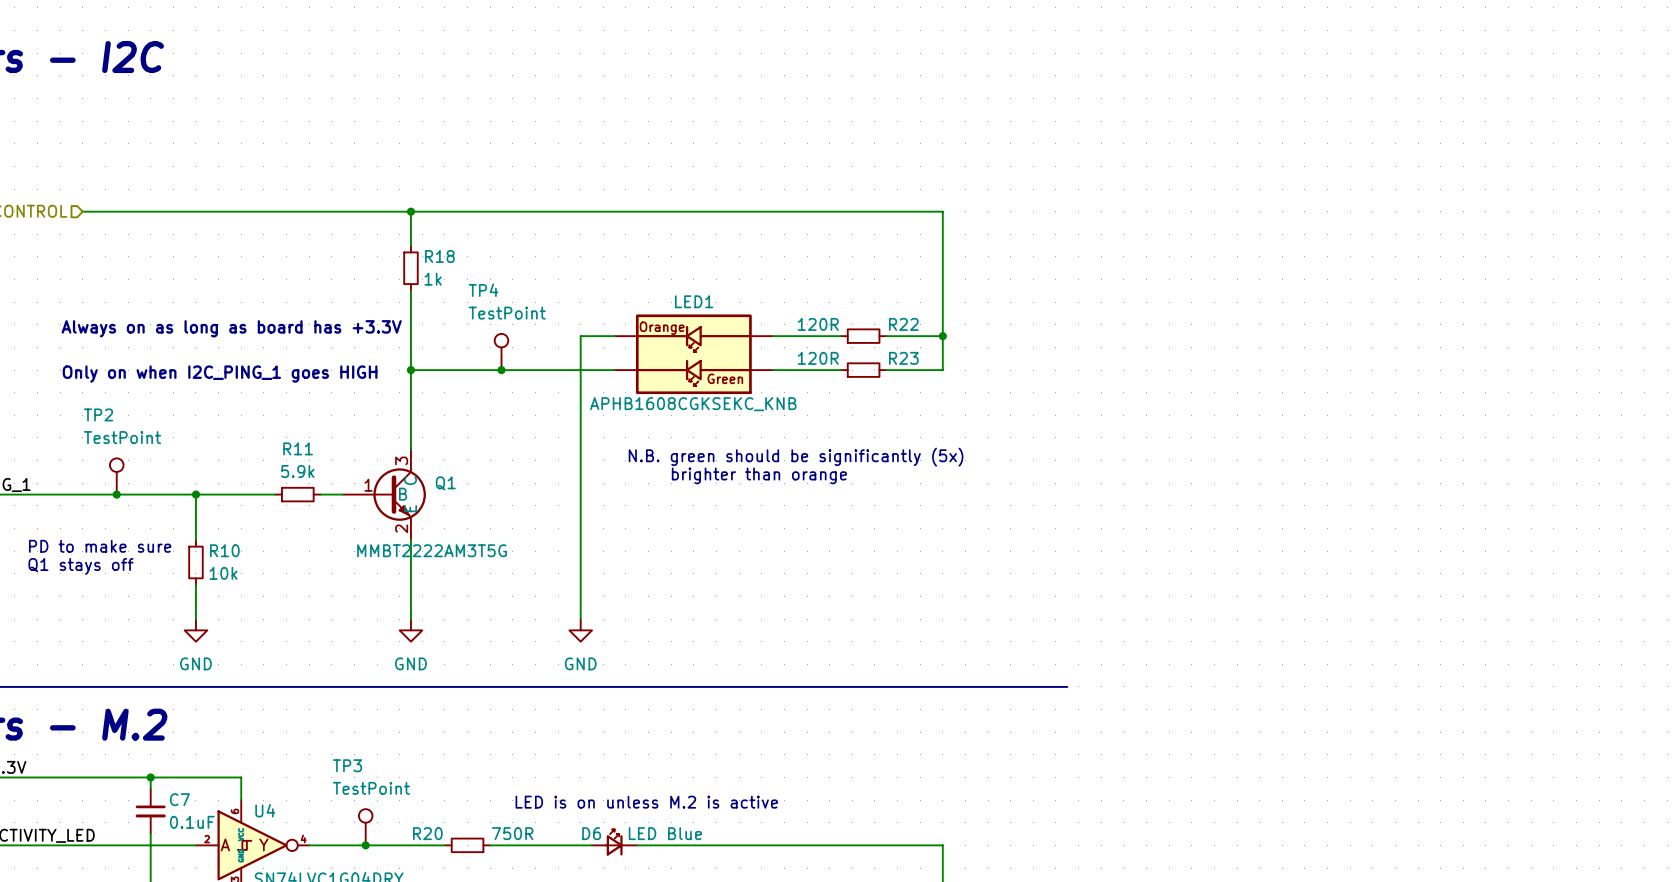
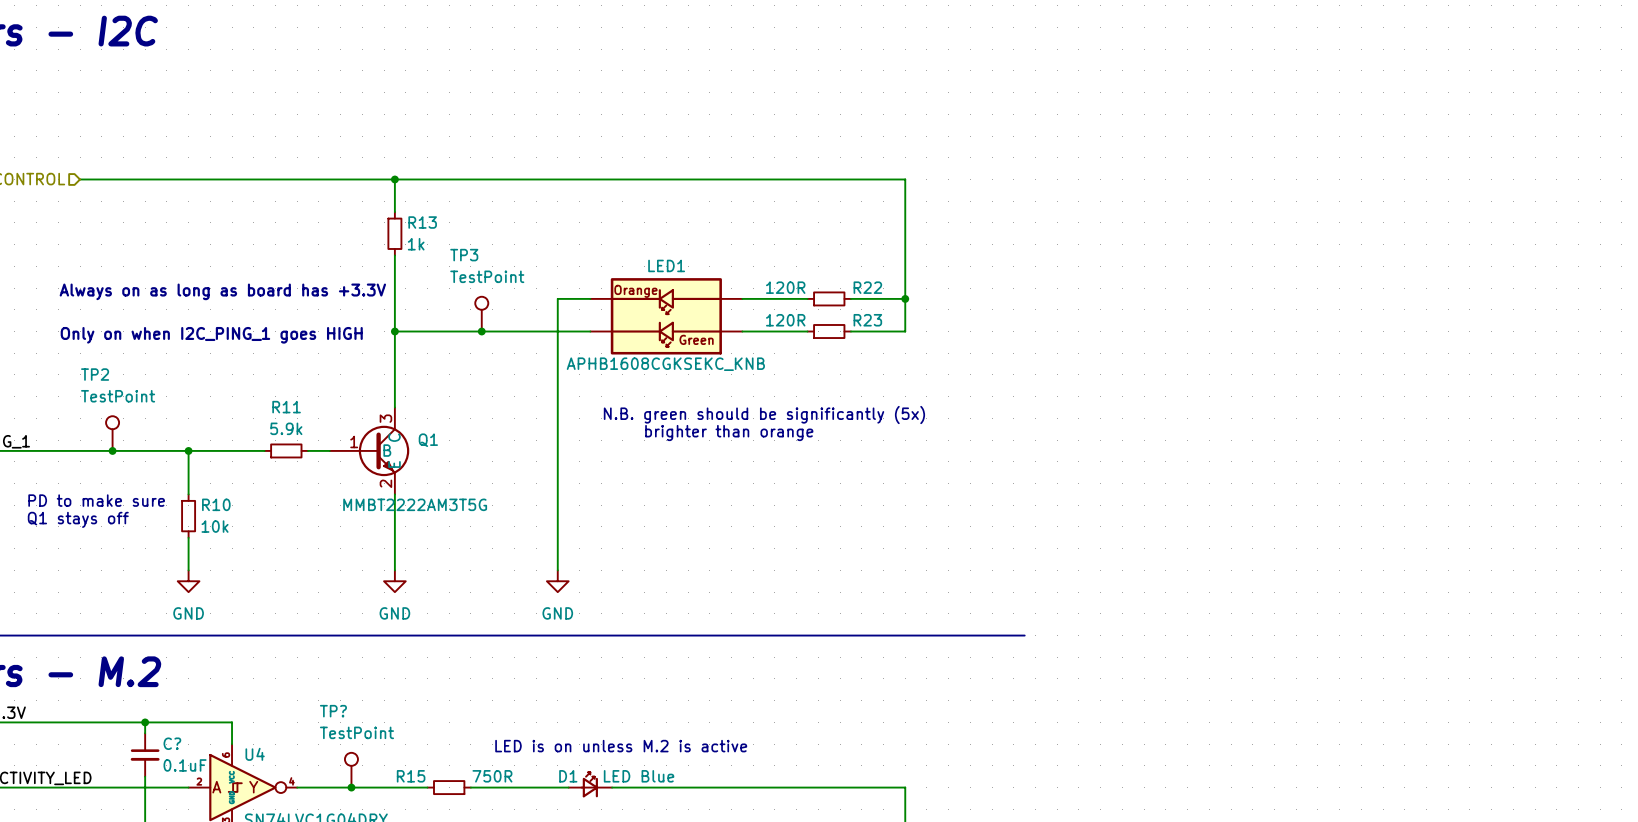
R18 name: R18 (439, 256) -> R13 (422, 222)
TP4 name: TP4 (483, 290) -> TP3 (464, 255)
TP3 name: TP3 (347, 765) -> TP? (333, 711)
C7 name: C7 (179, 799) -> C? (172, 743)
R20 name: R20 (427, 833) -> R15 (411, 776)
D6 name: D6 (591, 833) -> D1 (568, 776)

